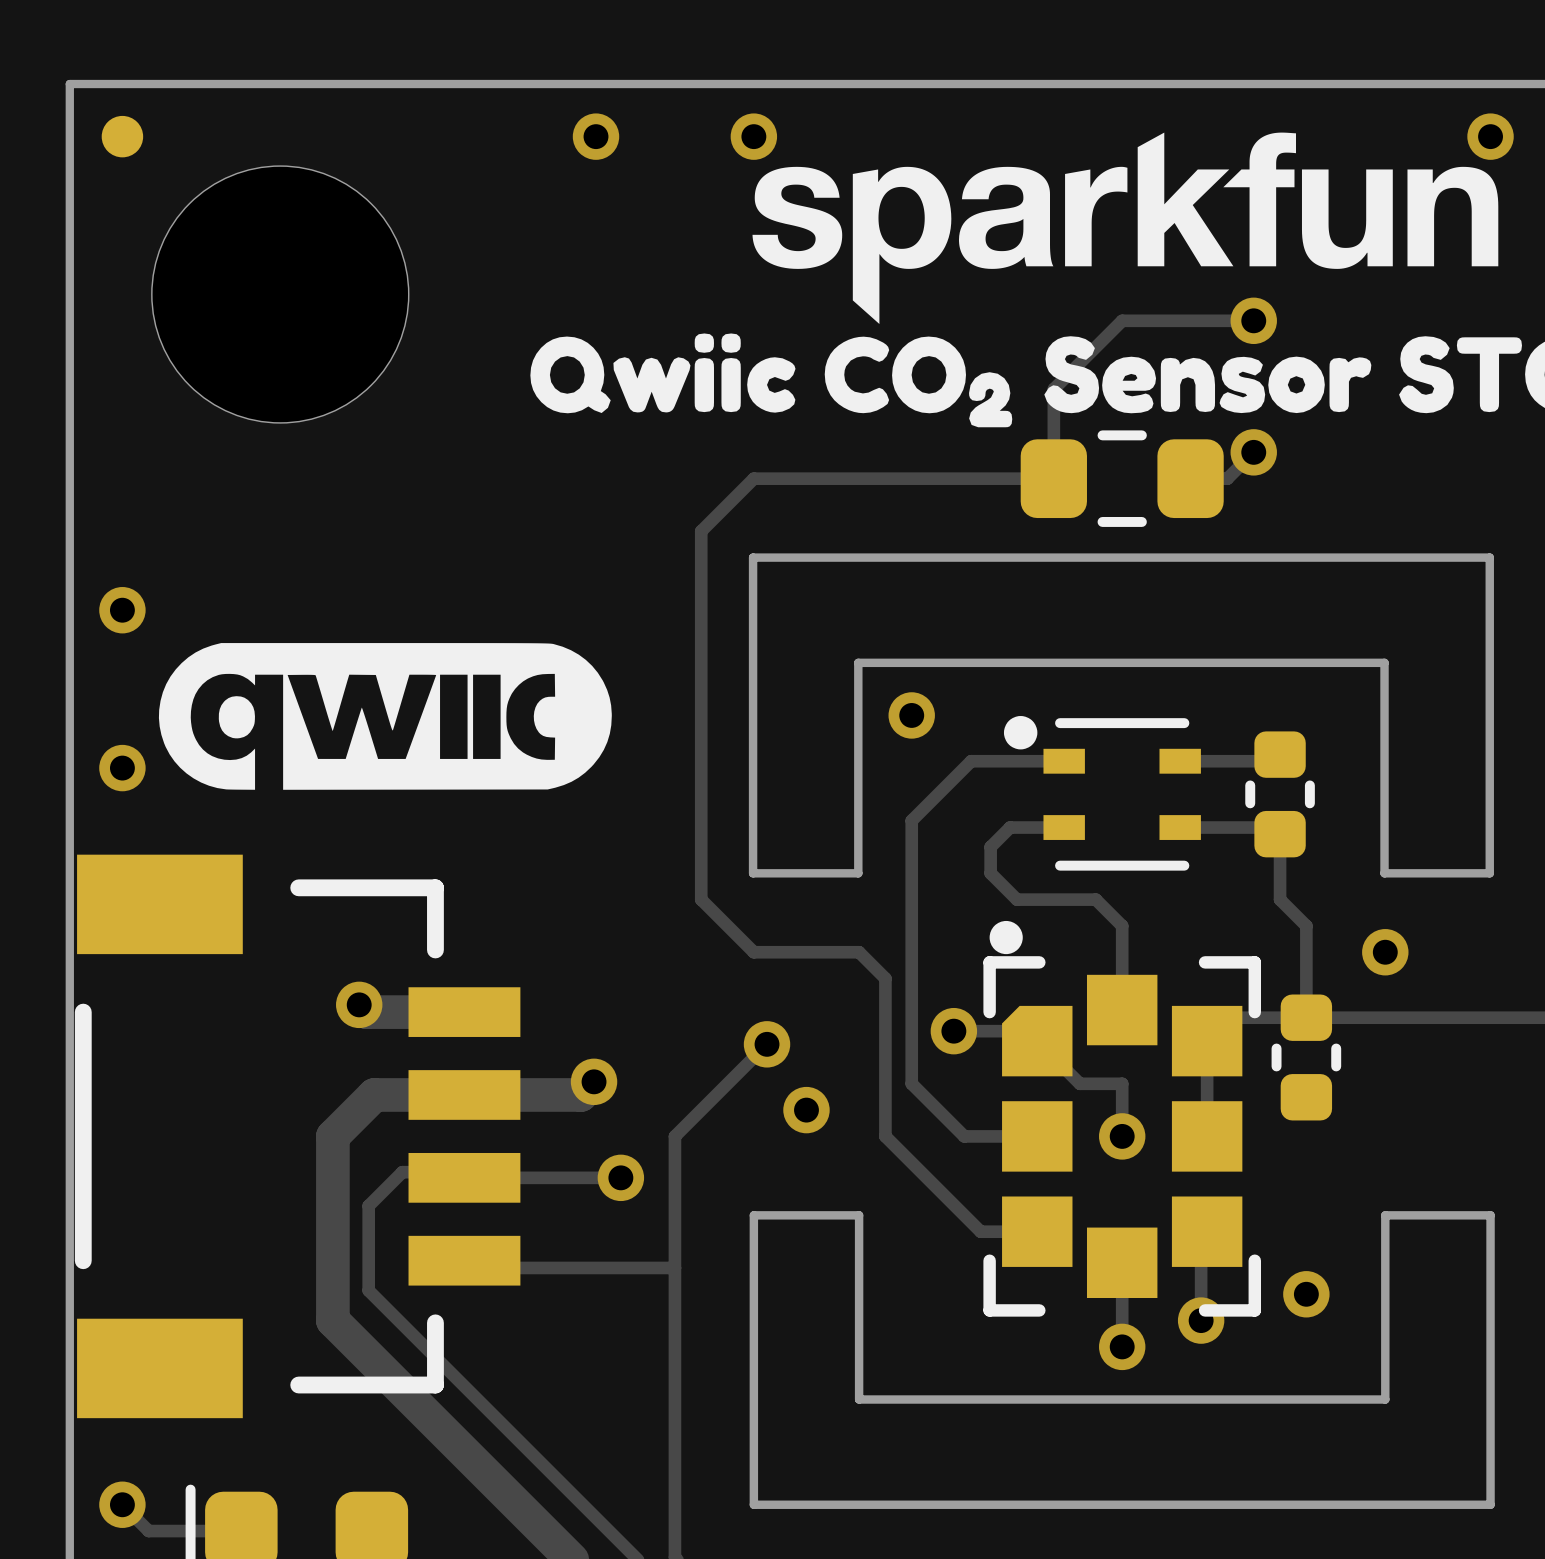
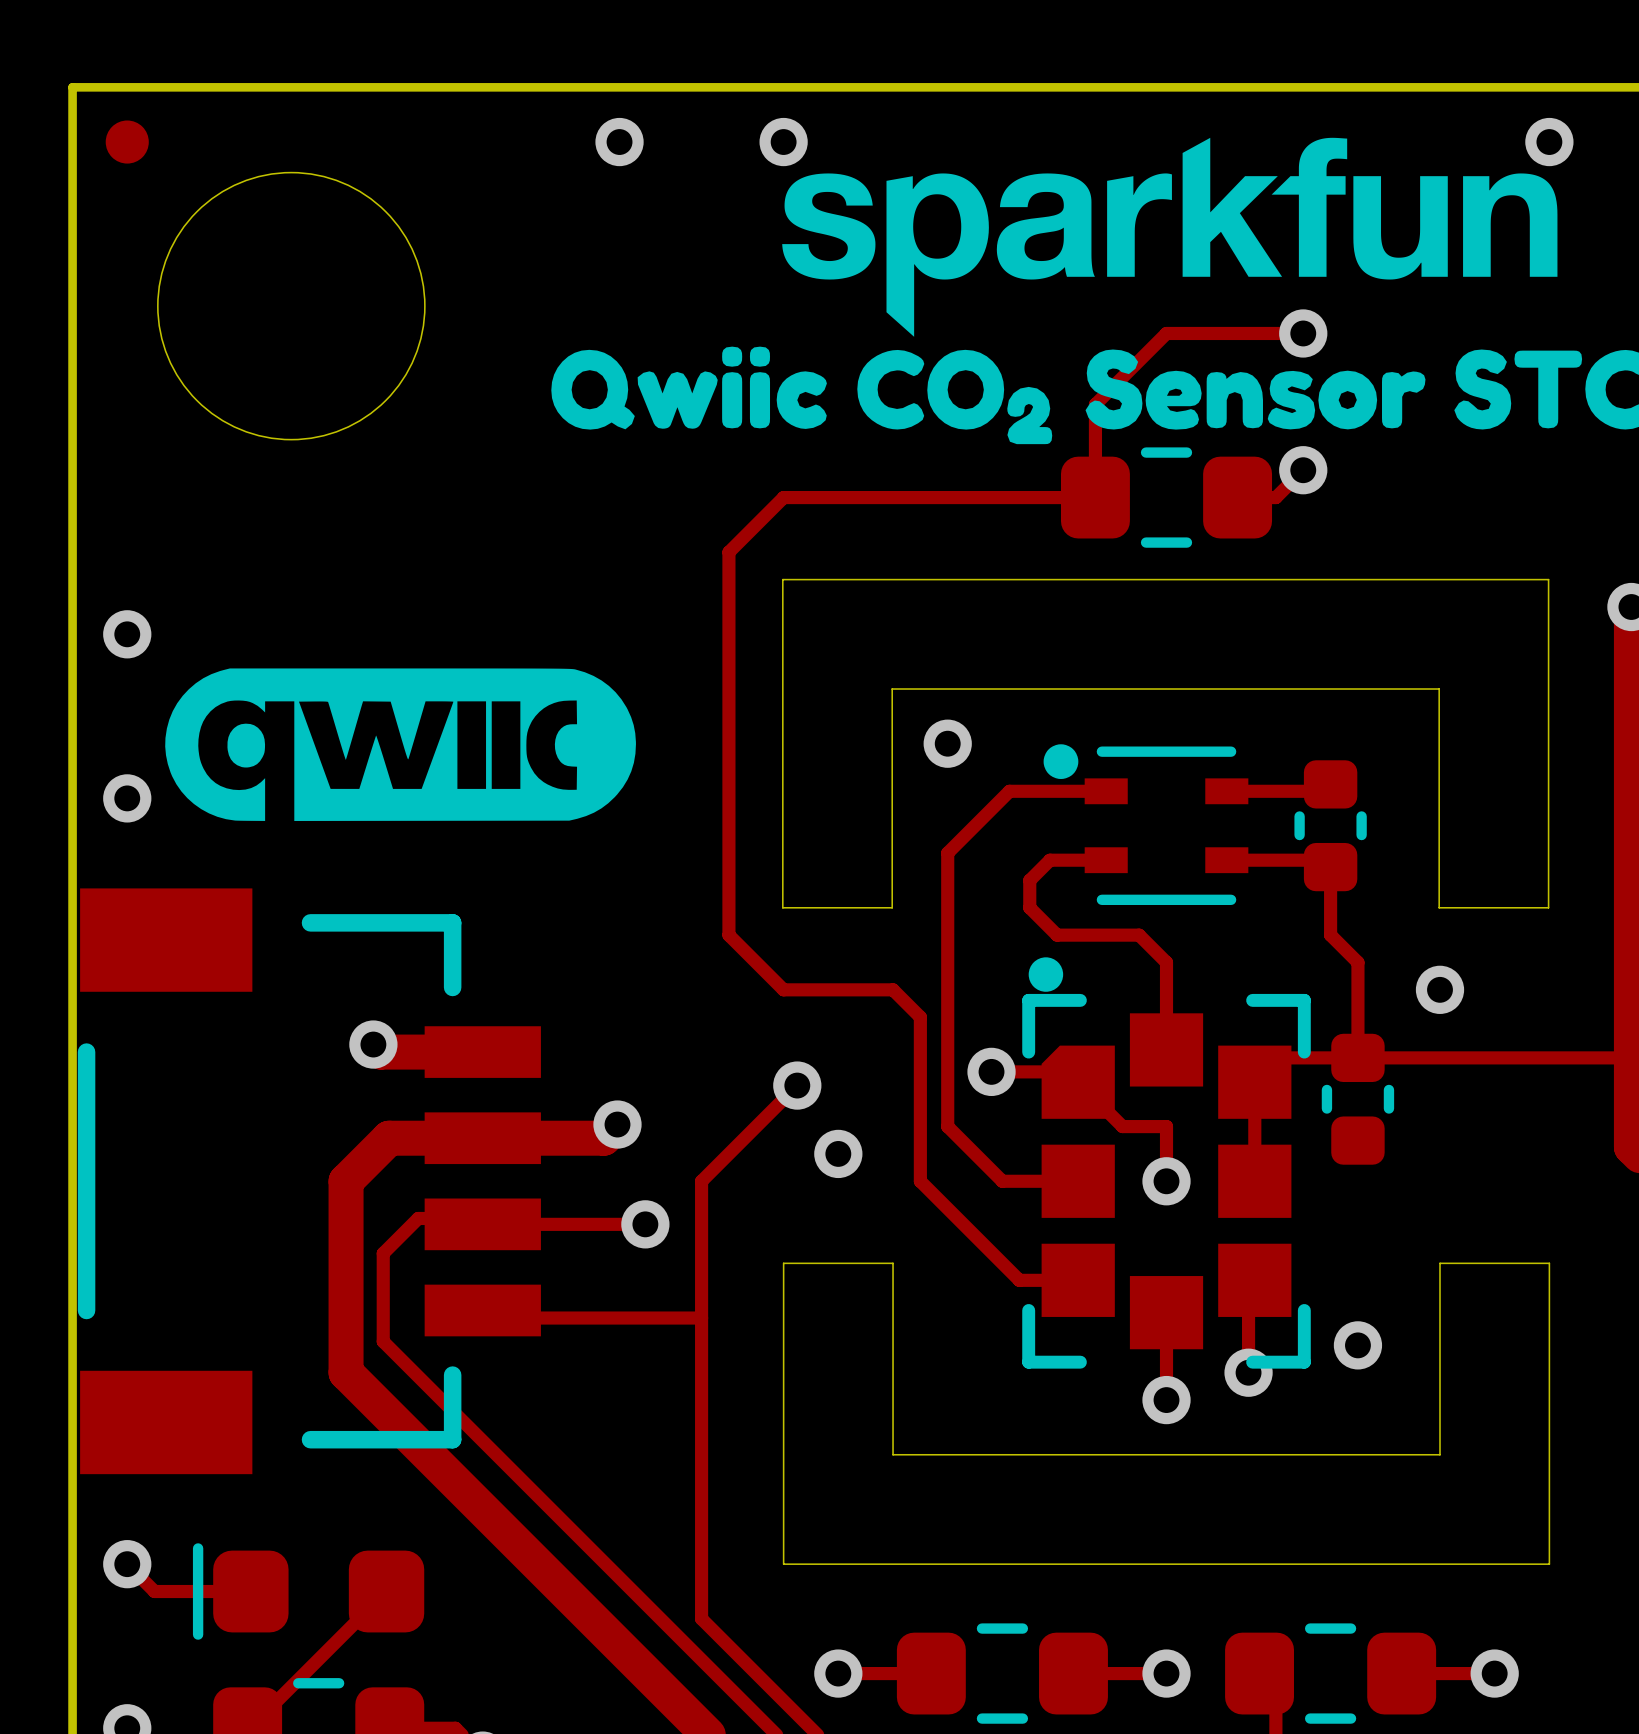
board edge width: thick (753, 557) (753, 873) (858, 873) (858, 662) (1384, 662) (1384, 873) (1489, 873) (1489, 557) (753, 557) -> thin (782, 579) (782, 907) (892, 907) (892, 689) (1439, 689) (1439, 907) (1548, 907) (1548, 579) (782, 579)
board edge width: thick (753, 1215) (753, 1504) (1490, 1504) (1490, 1215) (1385, 1215) (1385, 1399) (859, 1399) (859, 1215) (753, 1215) -> thin (783, 1263) (783, 1564) (1549, 1564) (1549, 1263) (1440, 1263) (1440, 1454) (893, 1454) (893, 1263) (783, 1263)

